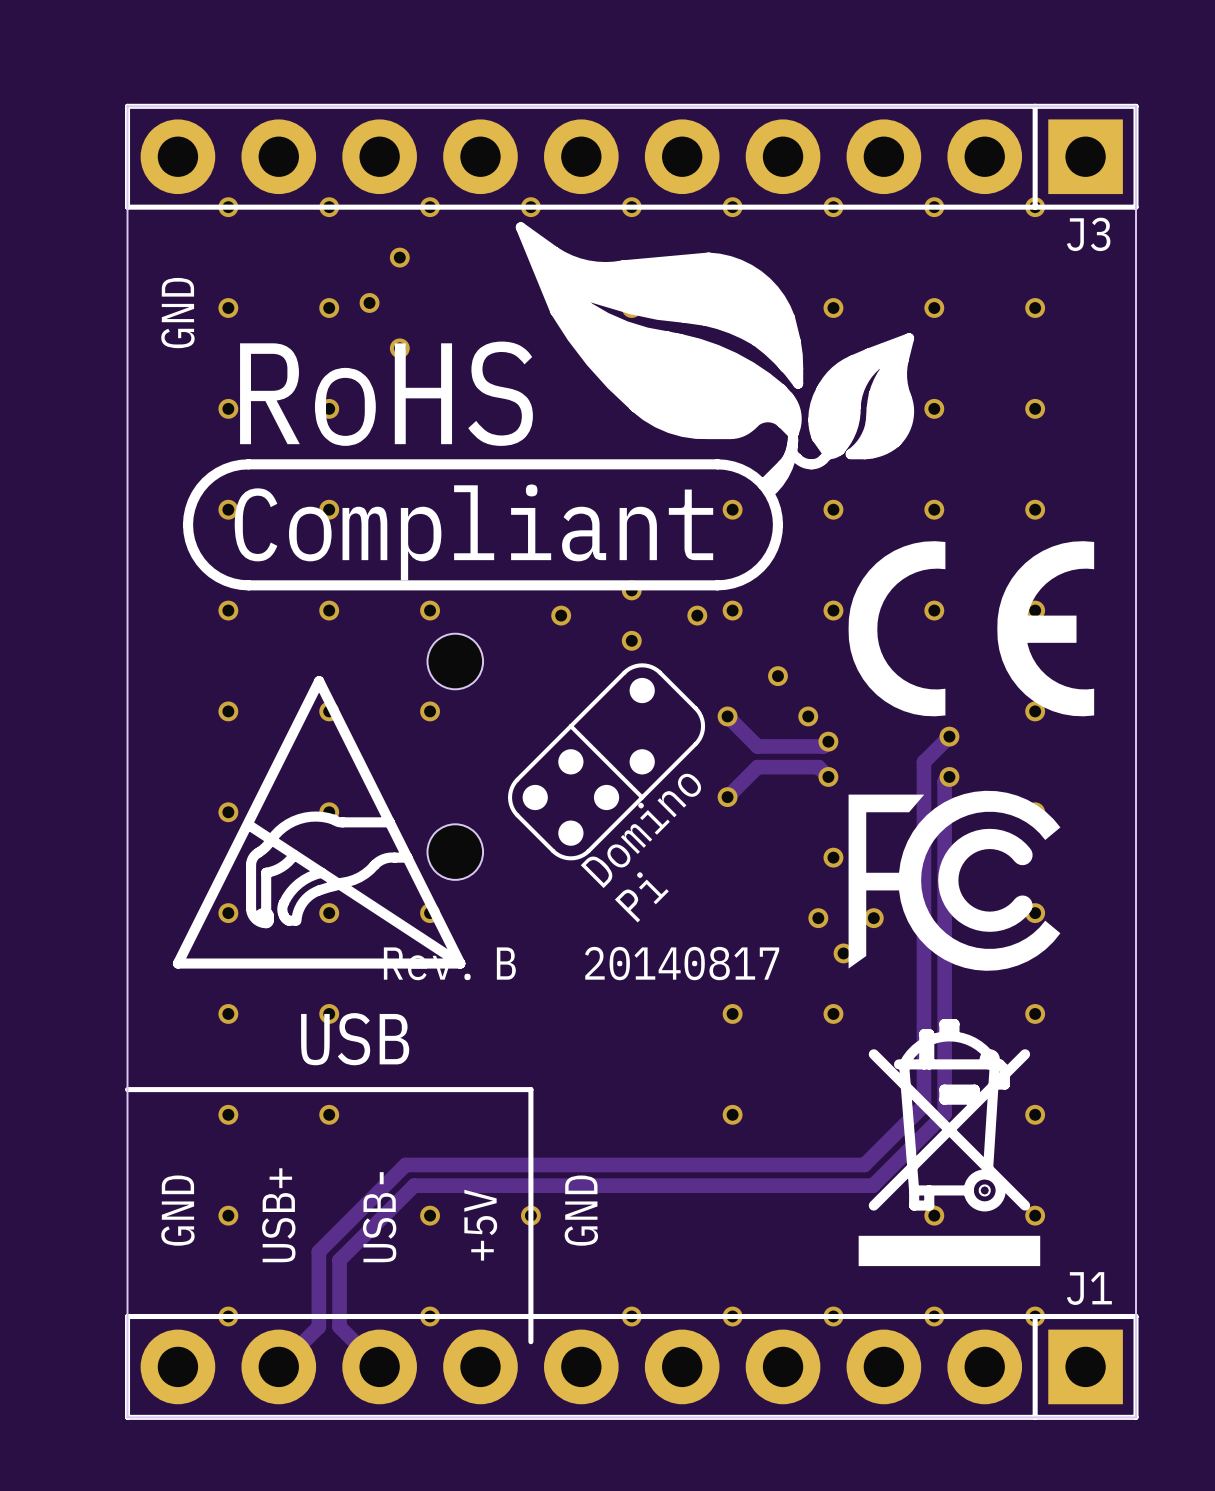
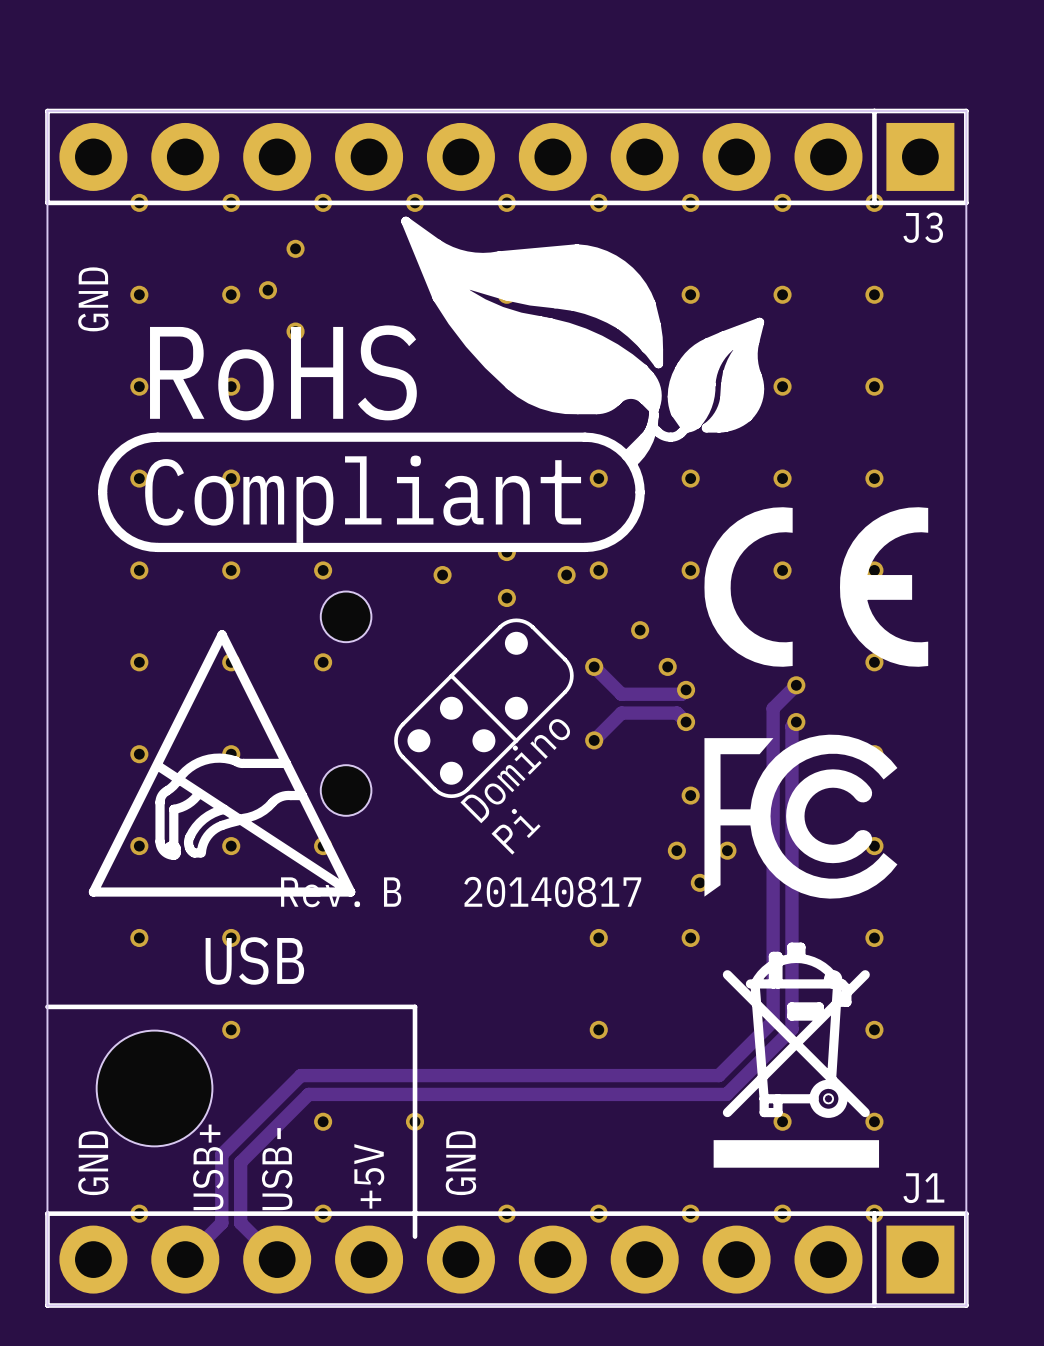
via: (228, 1114) -> none
hole: none -> (154, 1088)
text position: GND (177, 1210) -> GND (93, 1163)
text position: GND (581, 1210) -> GND (460, 1163)
via: (228, 1215) -> none
text position: USB+ (278, 1215) -> USB+ (208, 1167)
text position: USB- (379, 1217) -> USB- (277, 1169)
text position: +5V (480, 1225) -> +5V (369, 1176)

